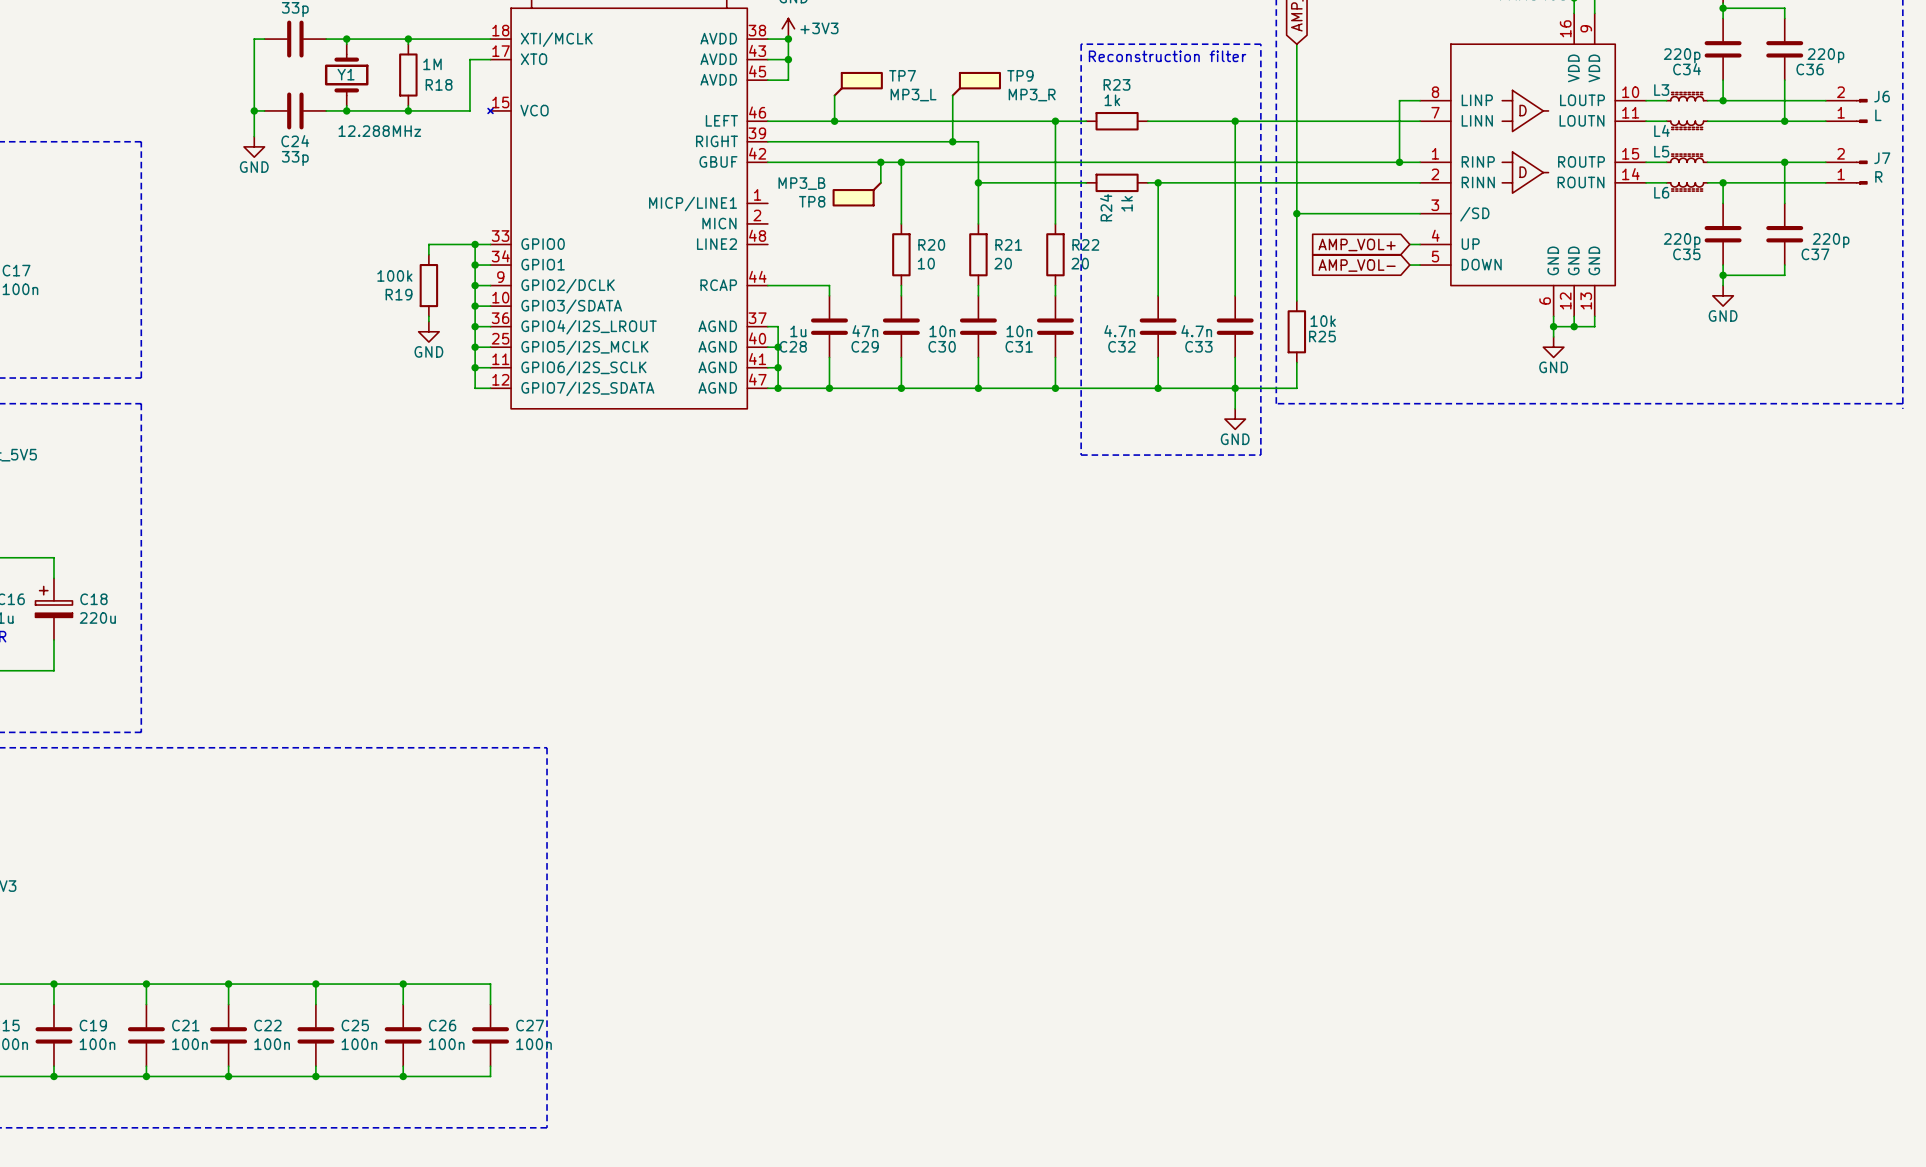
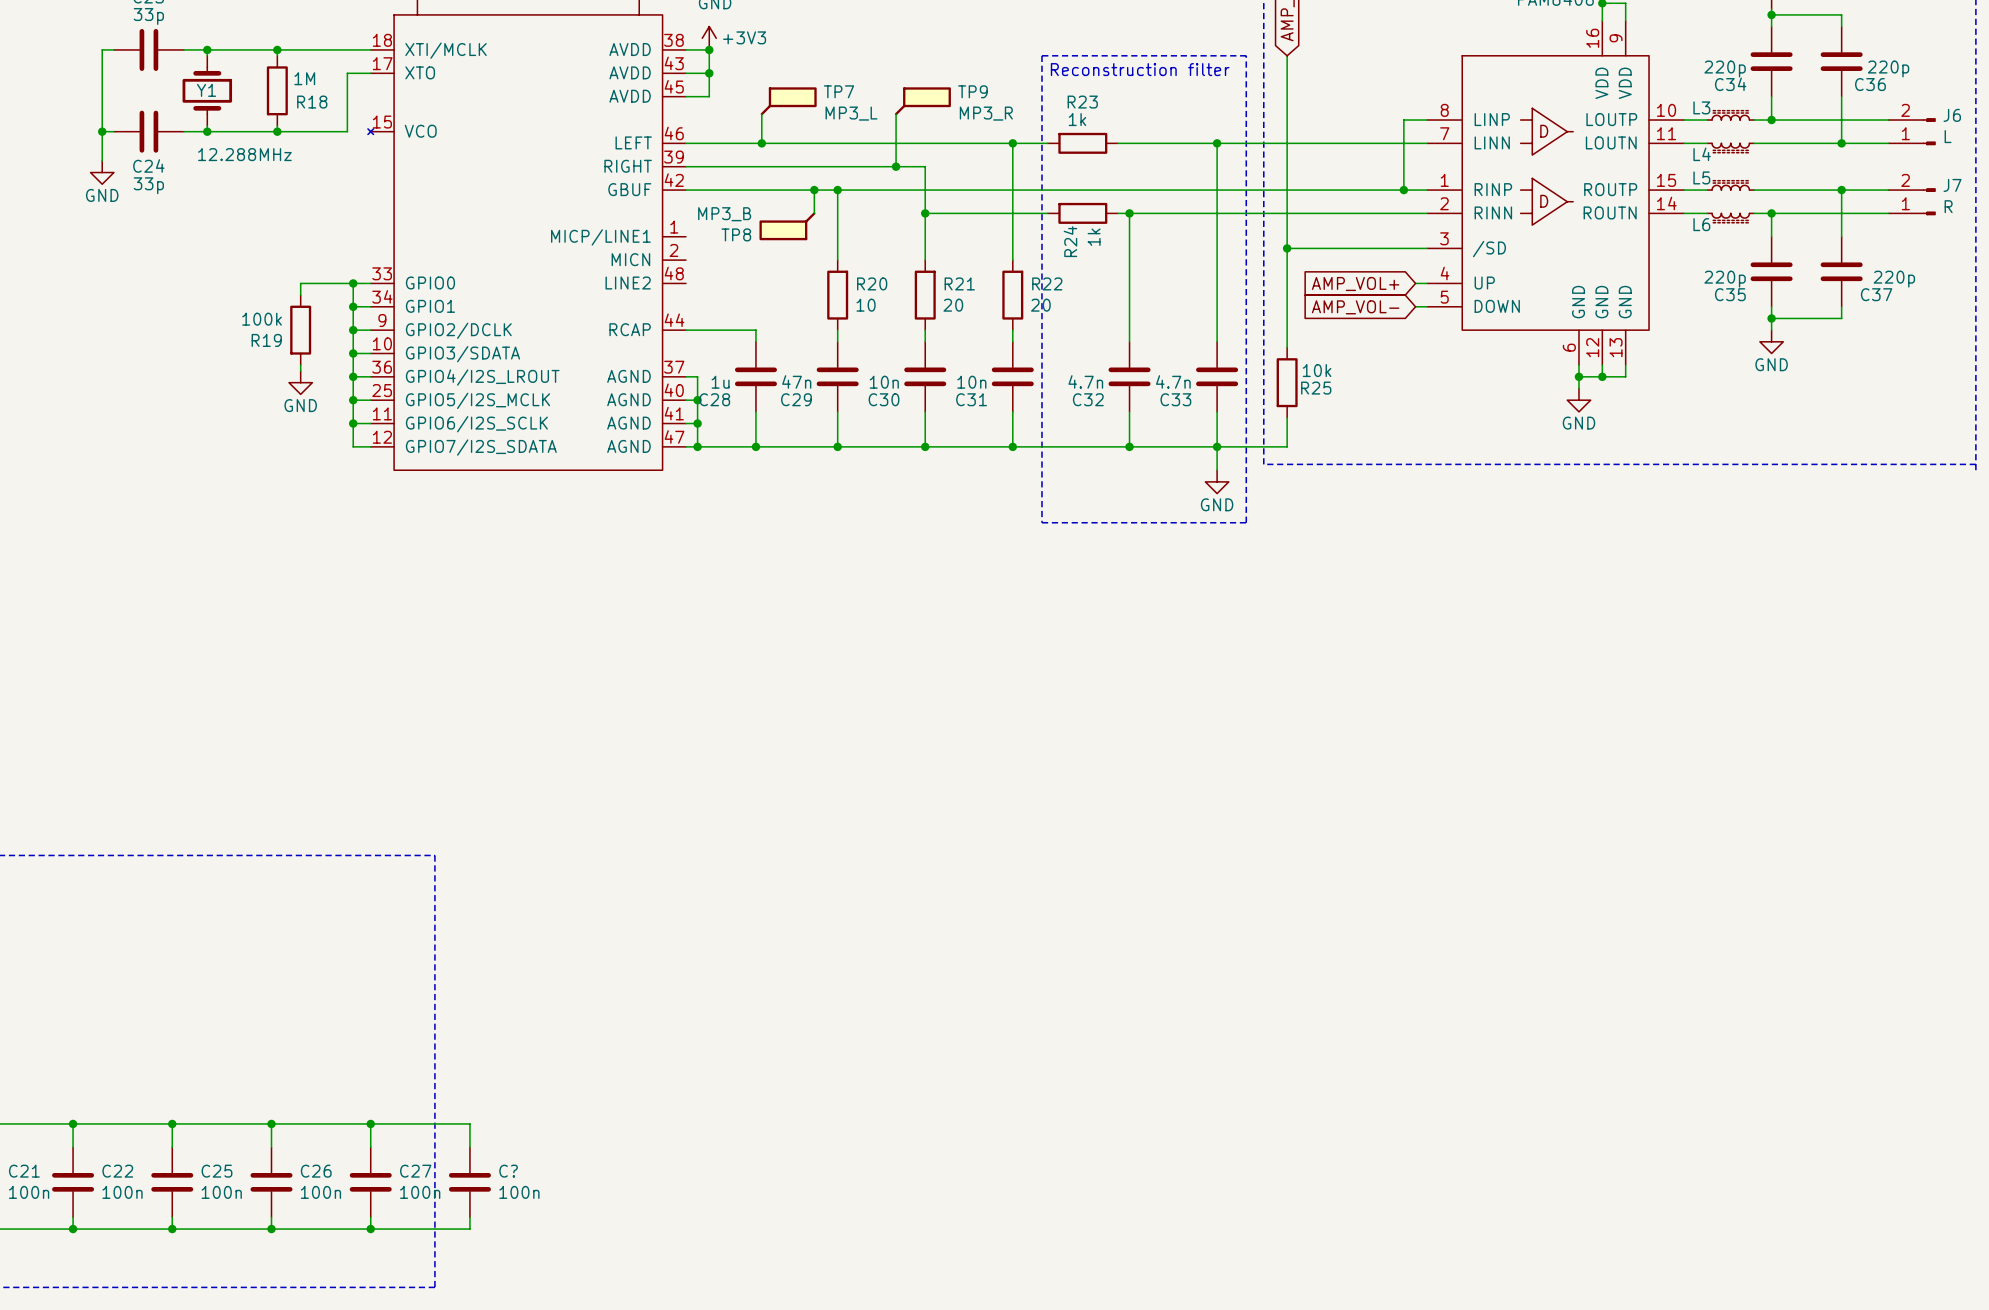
wire: none -> (370, 1123) (469, 1123) (469, 1147)
junction: none -> (370, 1123)
C?: none -> 100n (469, 1182)
wire: none -> (469, 1217) (469, 1229) (370, 1229)
junction: none -> (370, 1229)

